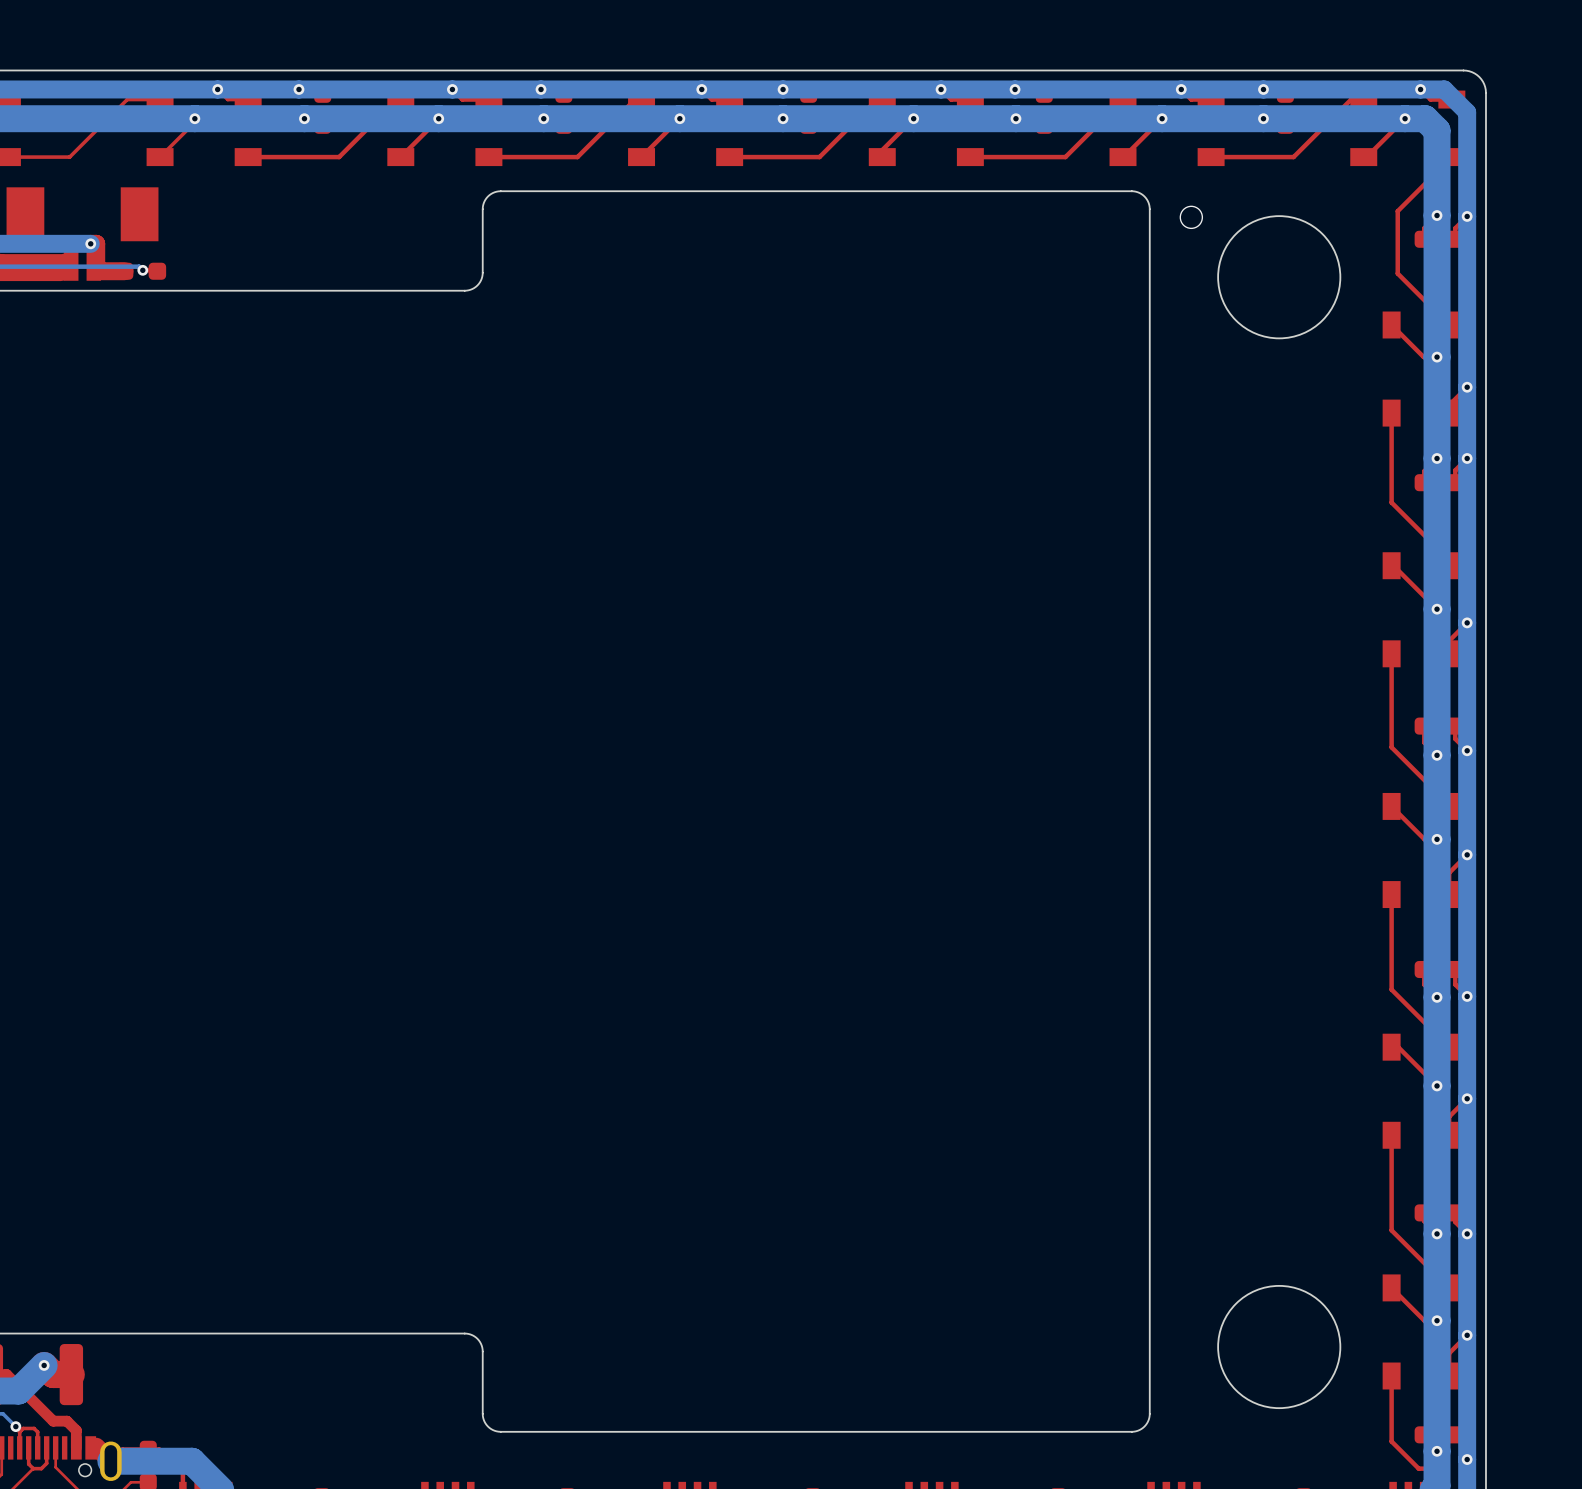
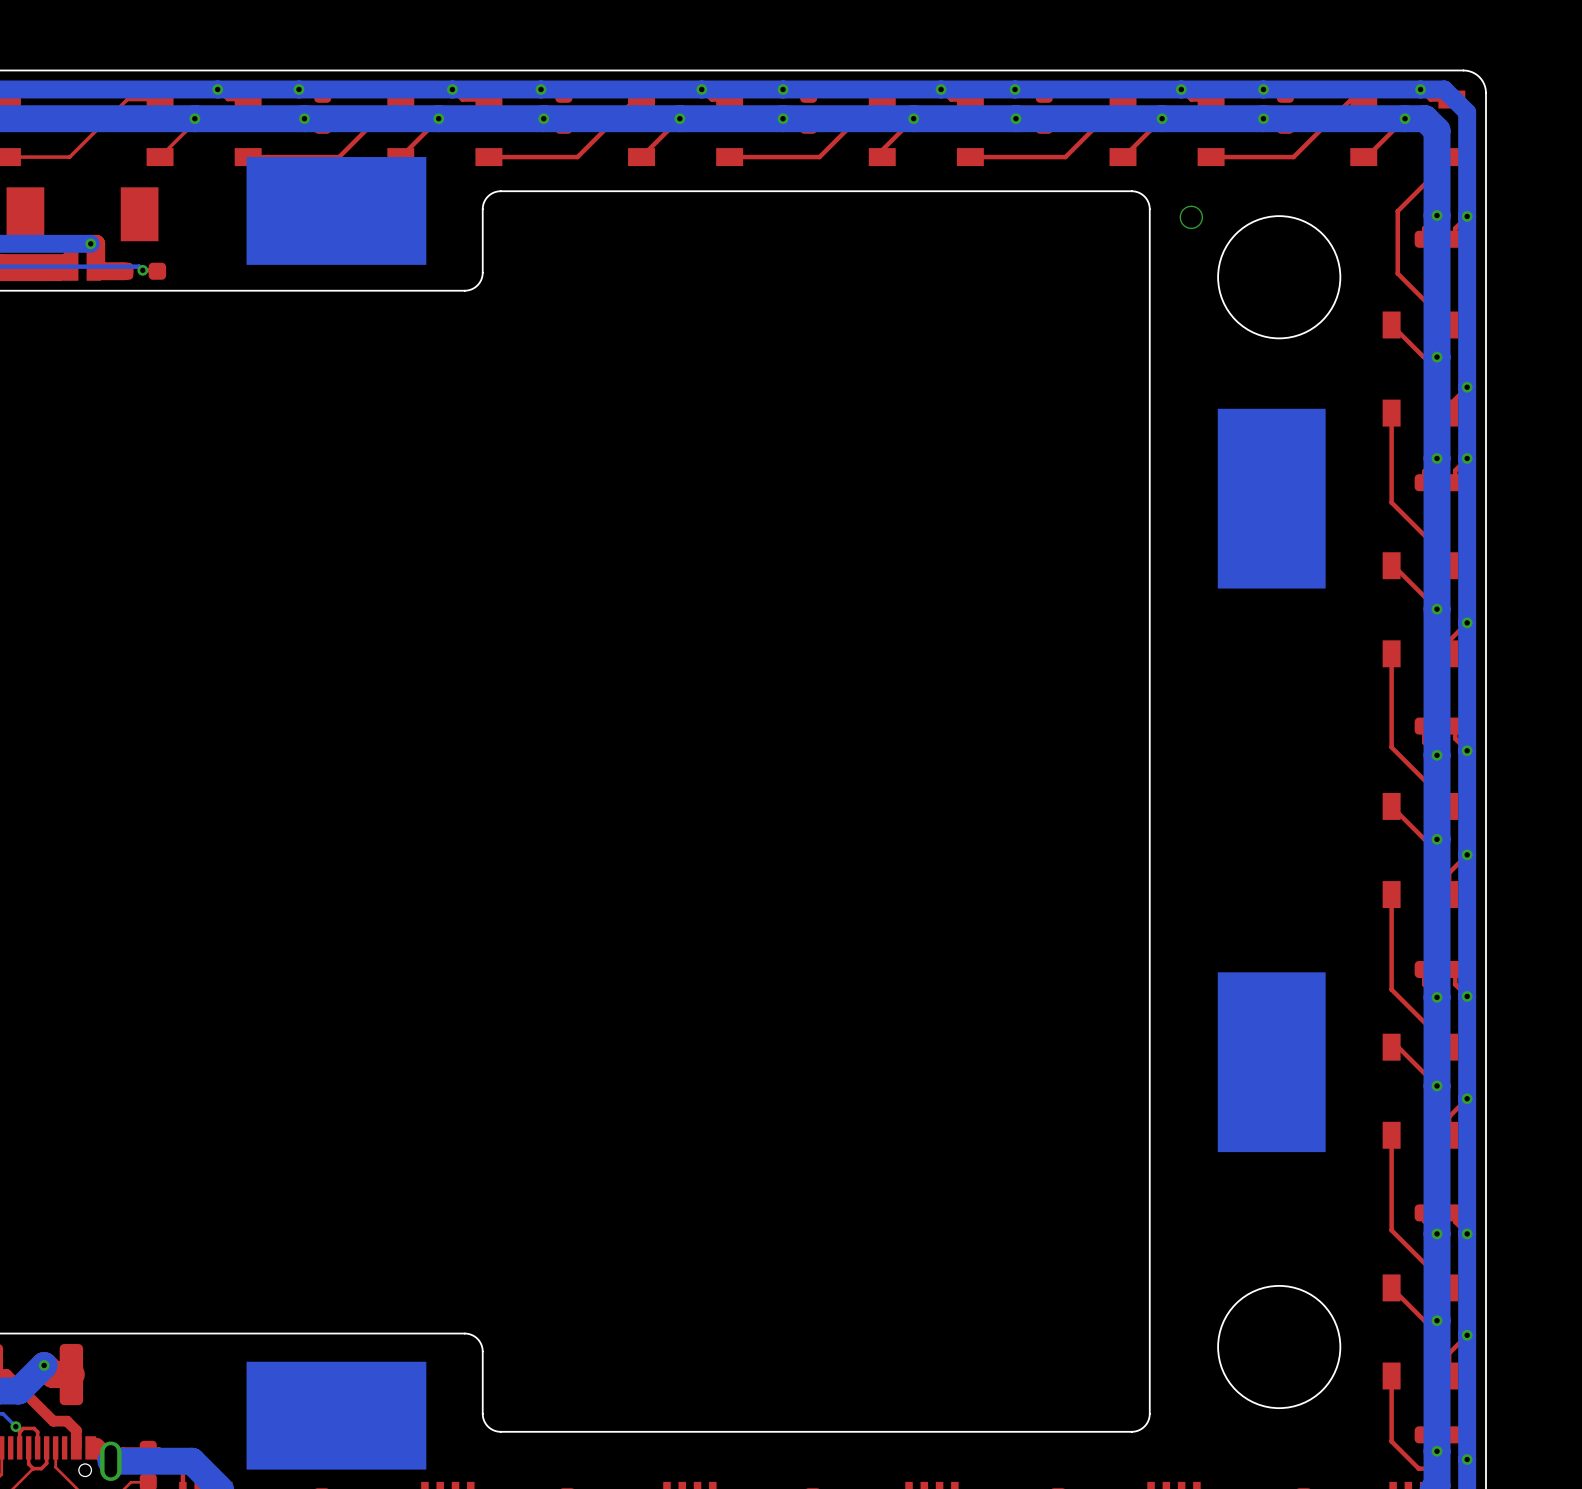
part: none -> (336, 210)
part: none -> (1271, 498)
part: none -> (1271, 1062)
part: none -> (336, 1415)

